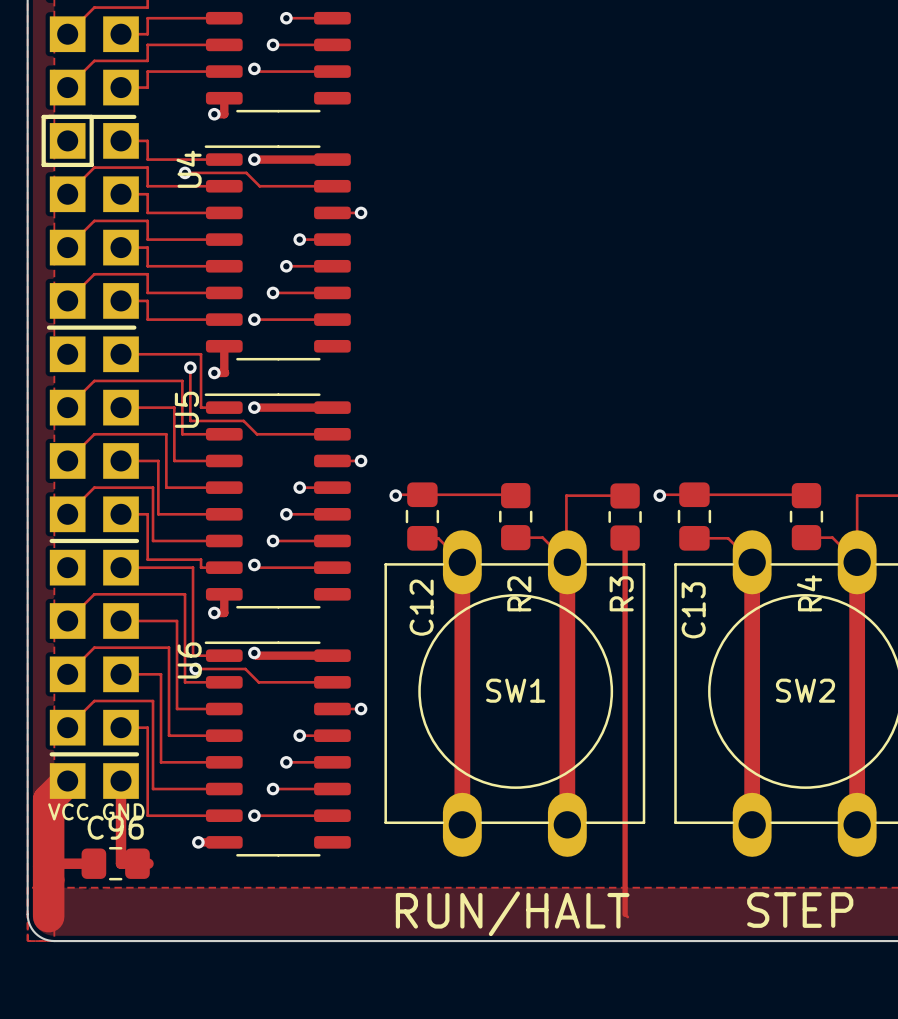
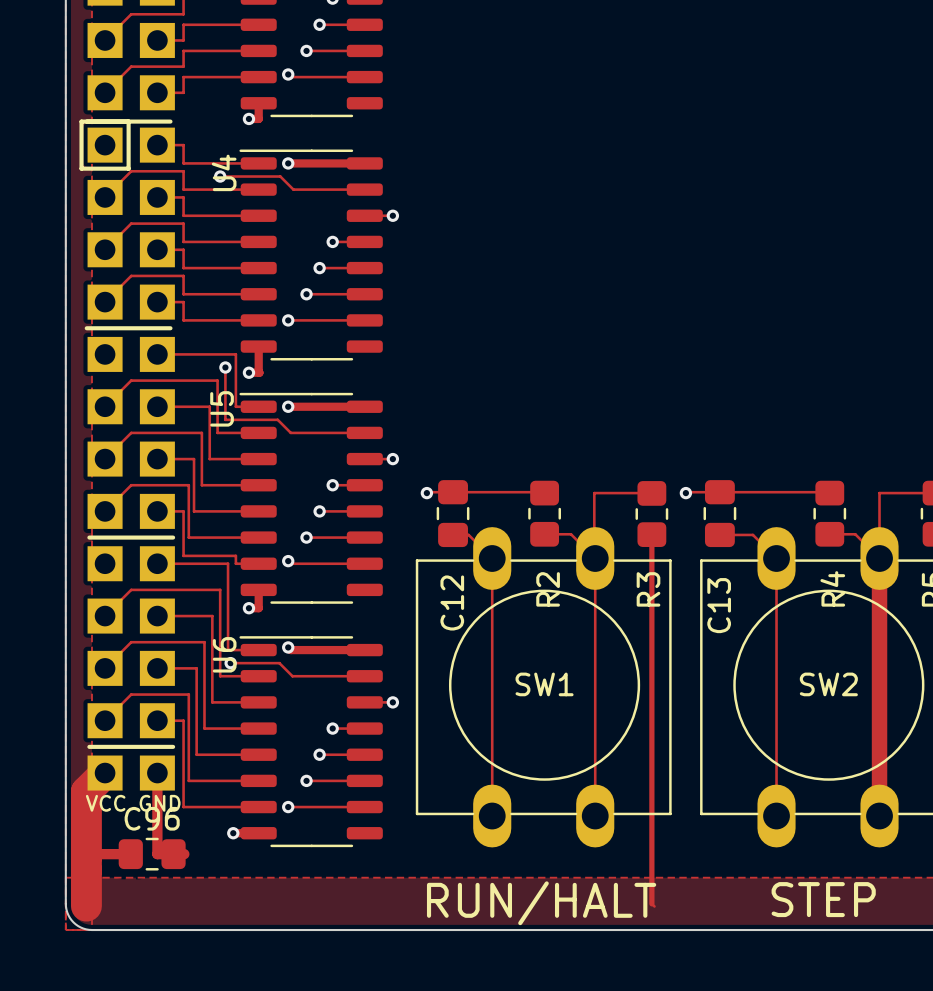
track width: thick (462, 562) (462, 824) -> thin (492, 558) (492, 816)
track width: thick (567, 562) (567, 824) -> thin (595, 558) (595, 816)
track width: thick (752, 562) (752, 824) -> thin (776, 558) (776, 816)

